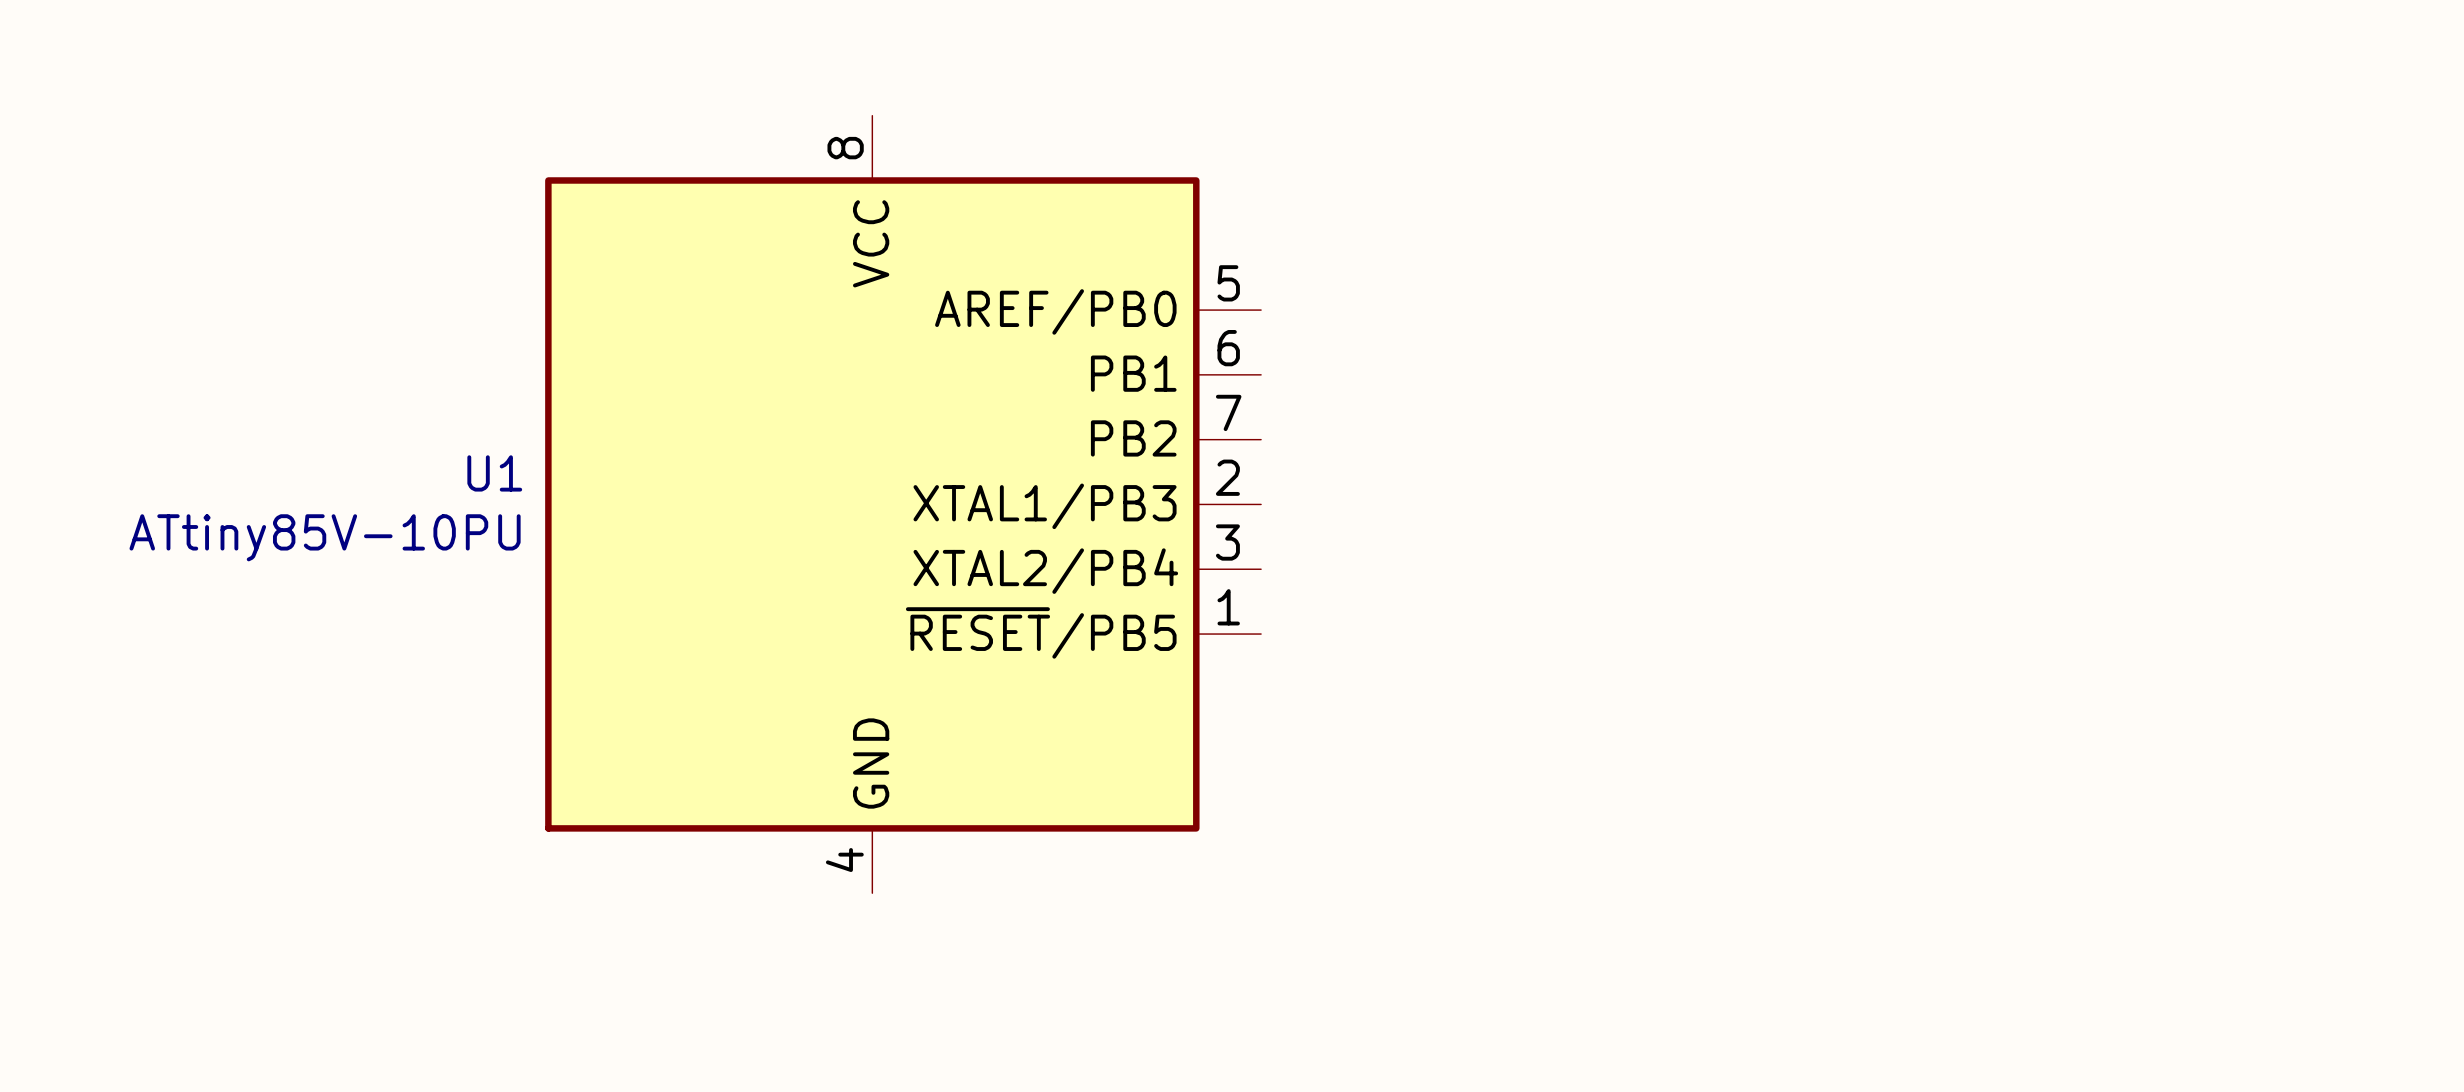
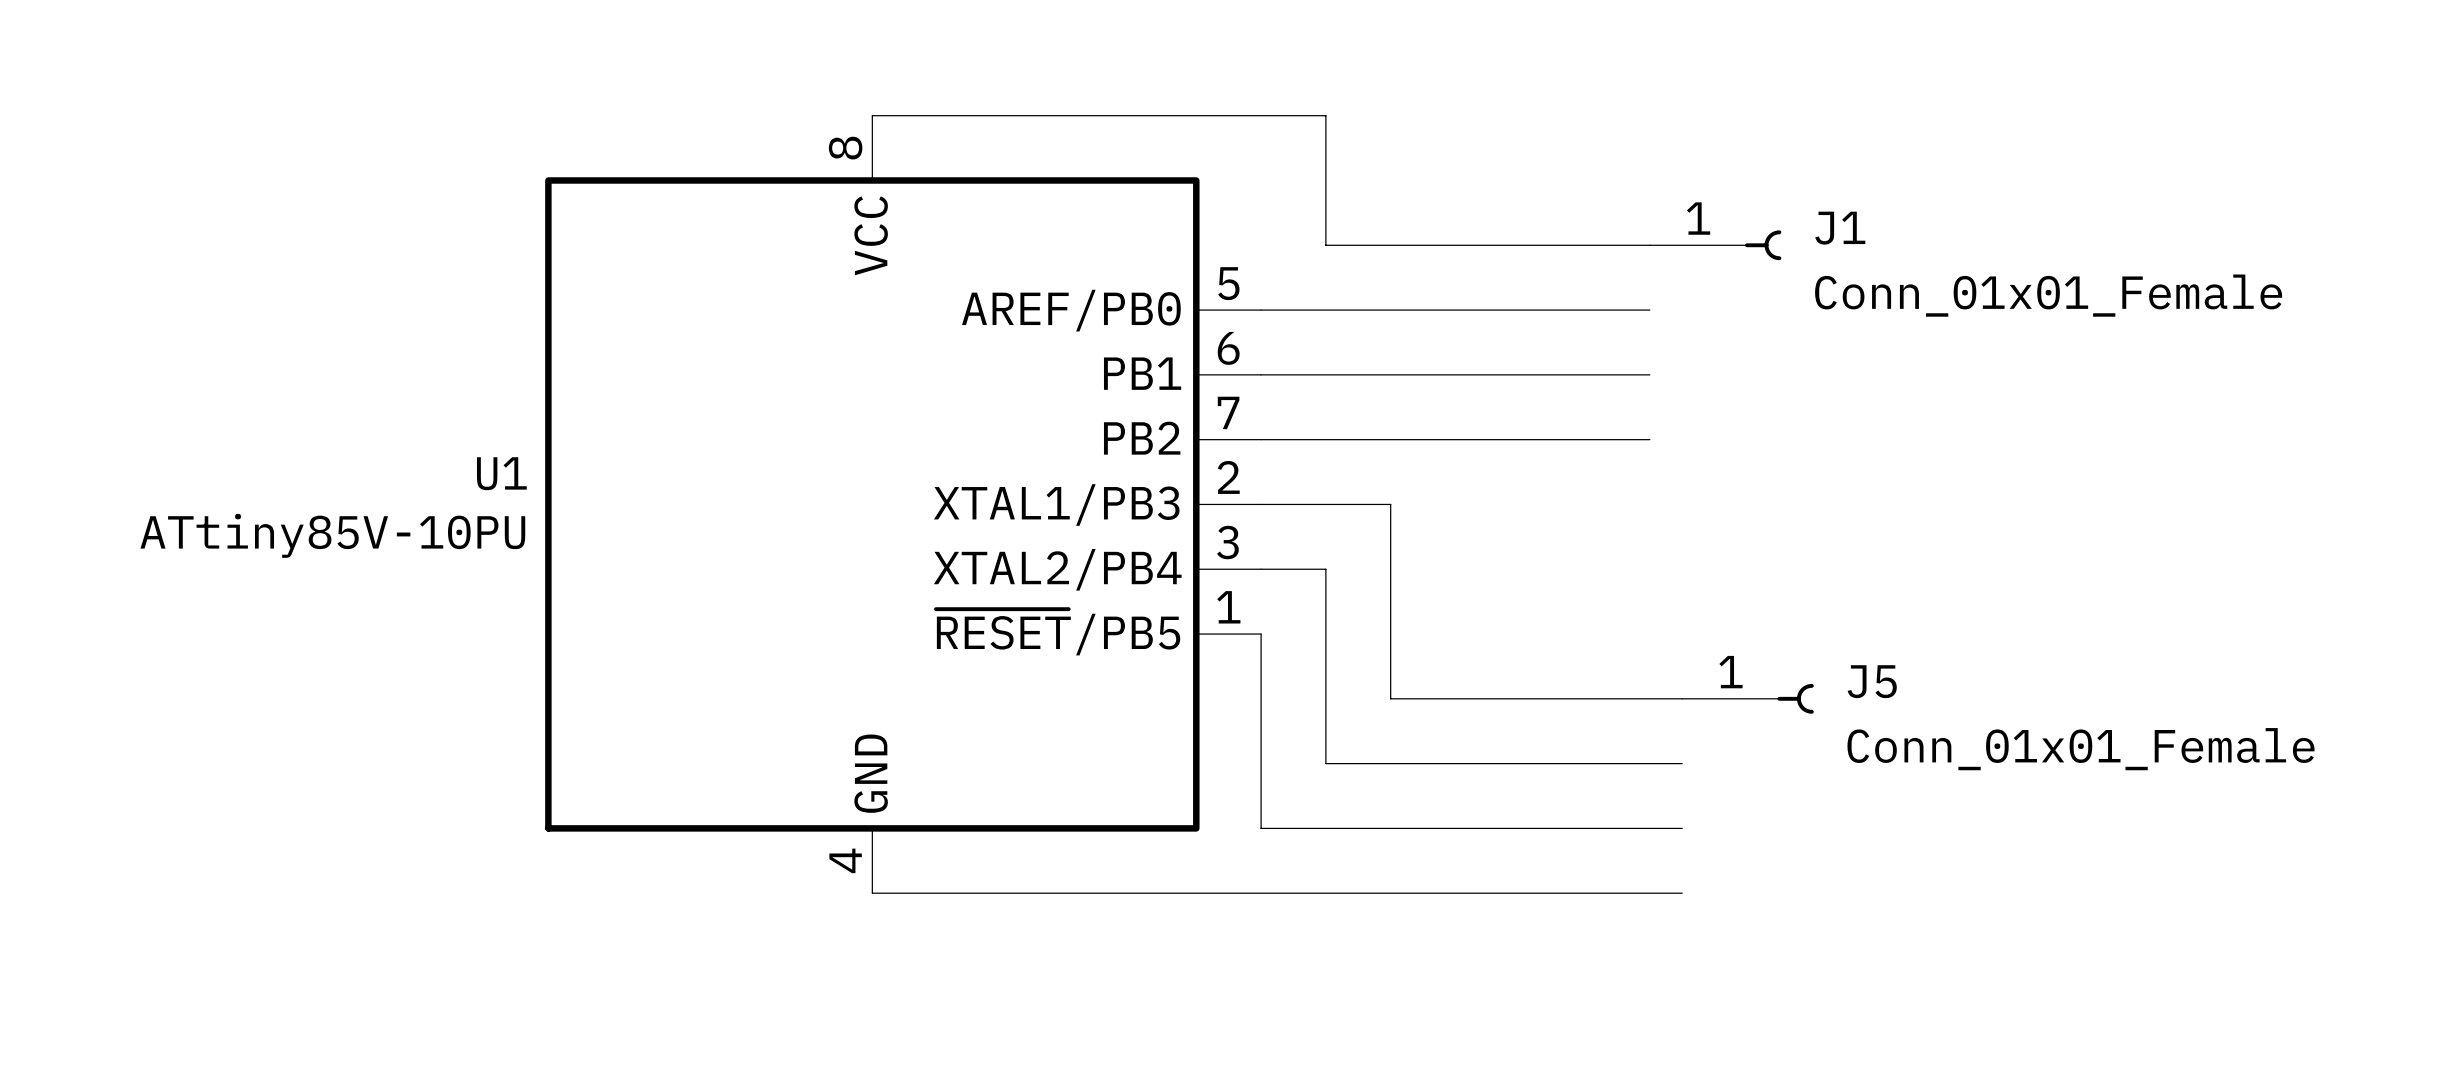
wire: none -> (872, 115) (1325, 115) (1325, 245) (1649, 245)
J1: none -> Conn_01x01_Female (1715, 245)
wire: none -> (1261, 310) (1649, 310)
wire: none -> (1261, 374) (1649, 374)
wire: none -> (1261, 439) (1649, 439)
wire: none -> (1261, 504) (1390, 504) (1390, 698) (1682, 698)
wire: none -> (1261, 569) (1325, 569) (1325, 763) (1682, 763)
wire: none -> (1261, 634) (1261, 828) (1682, 828)
J5: none -> Conn_01x01_Female (1748, 698)
wire: none -> (872, 893) (1682, 893)

